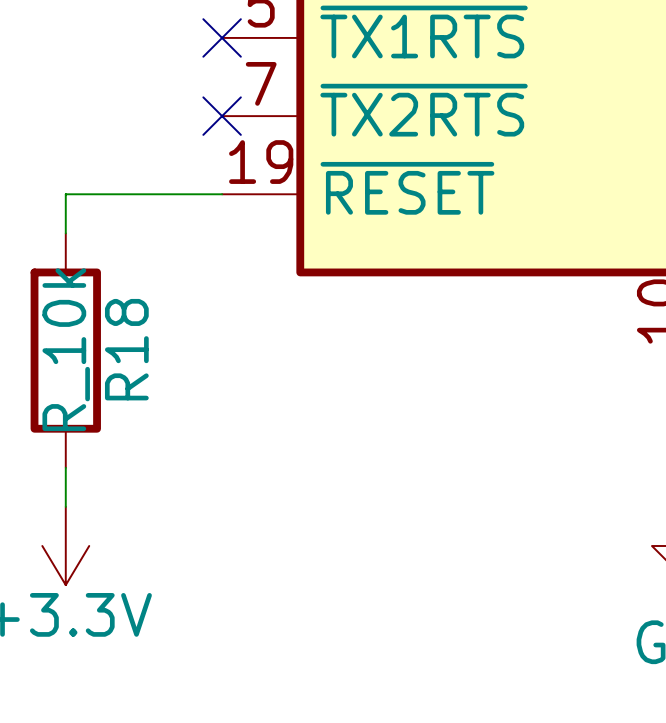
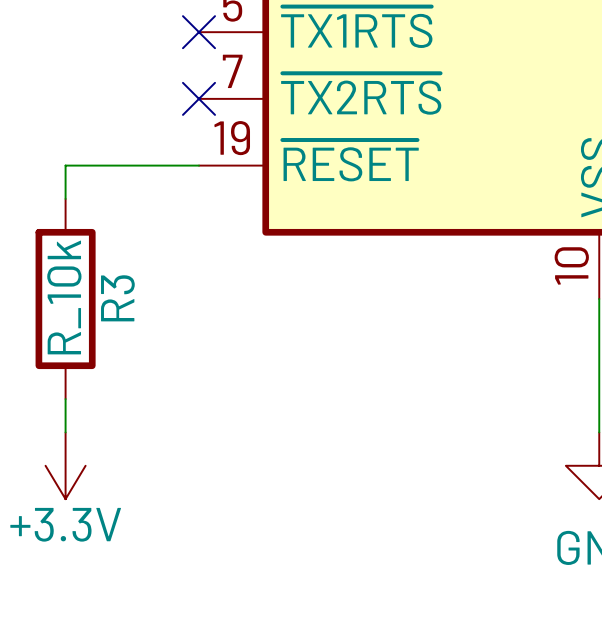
R18 name: R18 (126, 349) -> R3 (117, 298)

